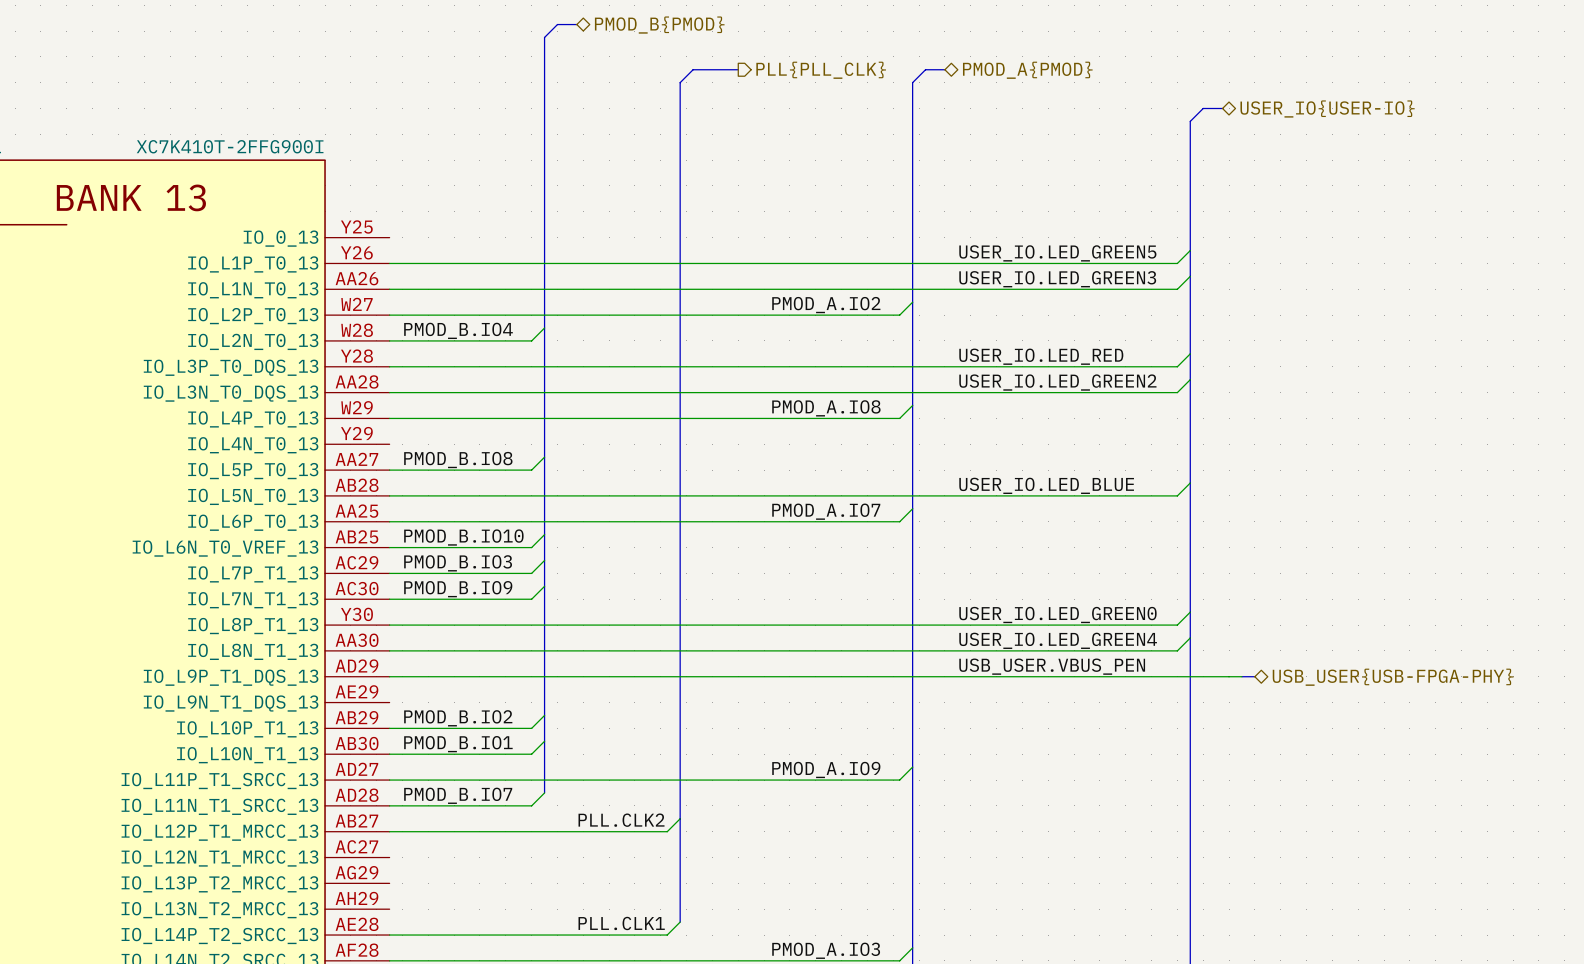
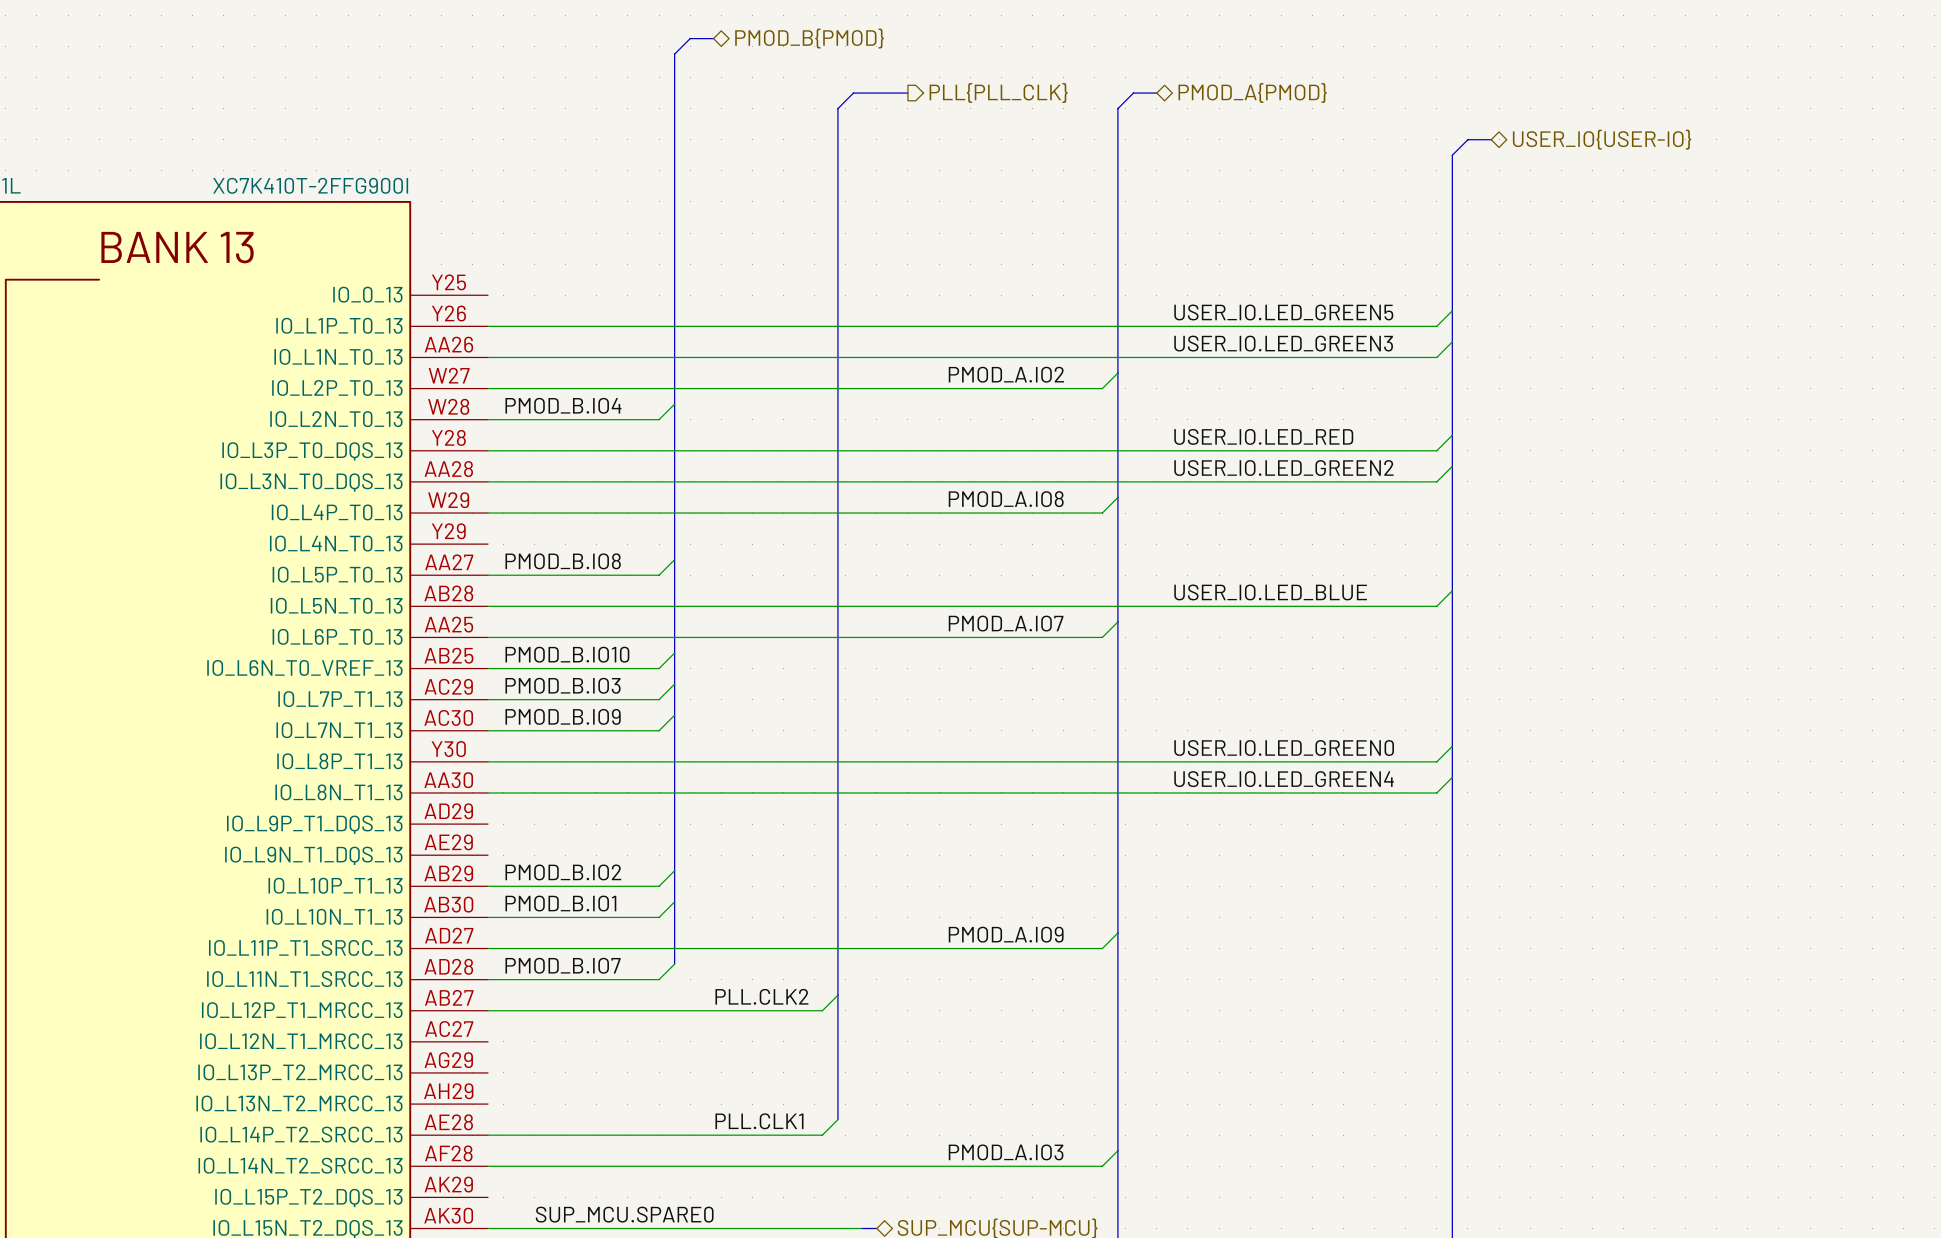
label: USB_USER.VBUS_PEN (1052, 666) -> none
wire: (389, 676) (1241, 676) -> none
bus: (1241, 676) (1254, 676) -> none
hierarchical label: USB_USER{USB-FPGA-PHY} (1393, 677) -> none

